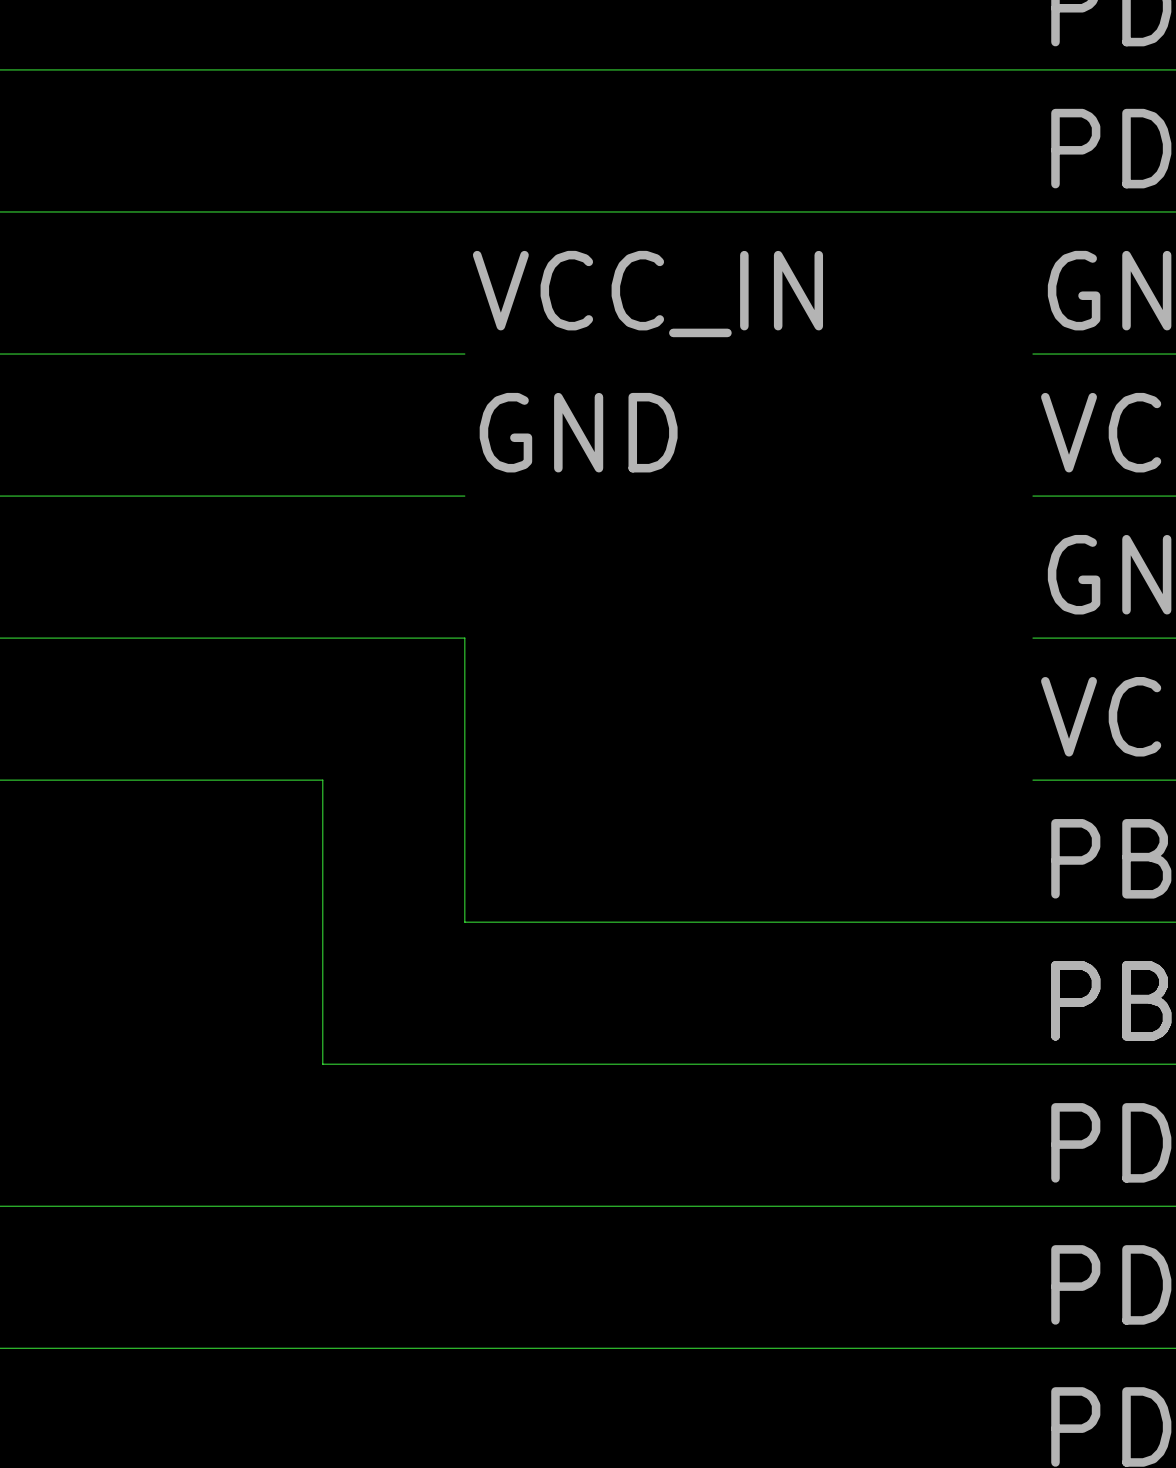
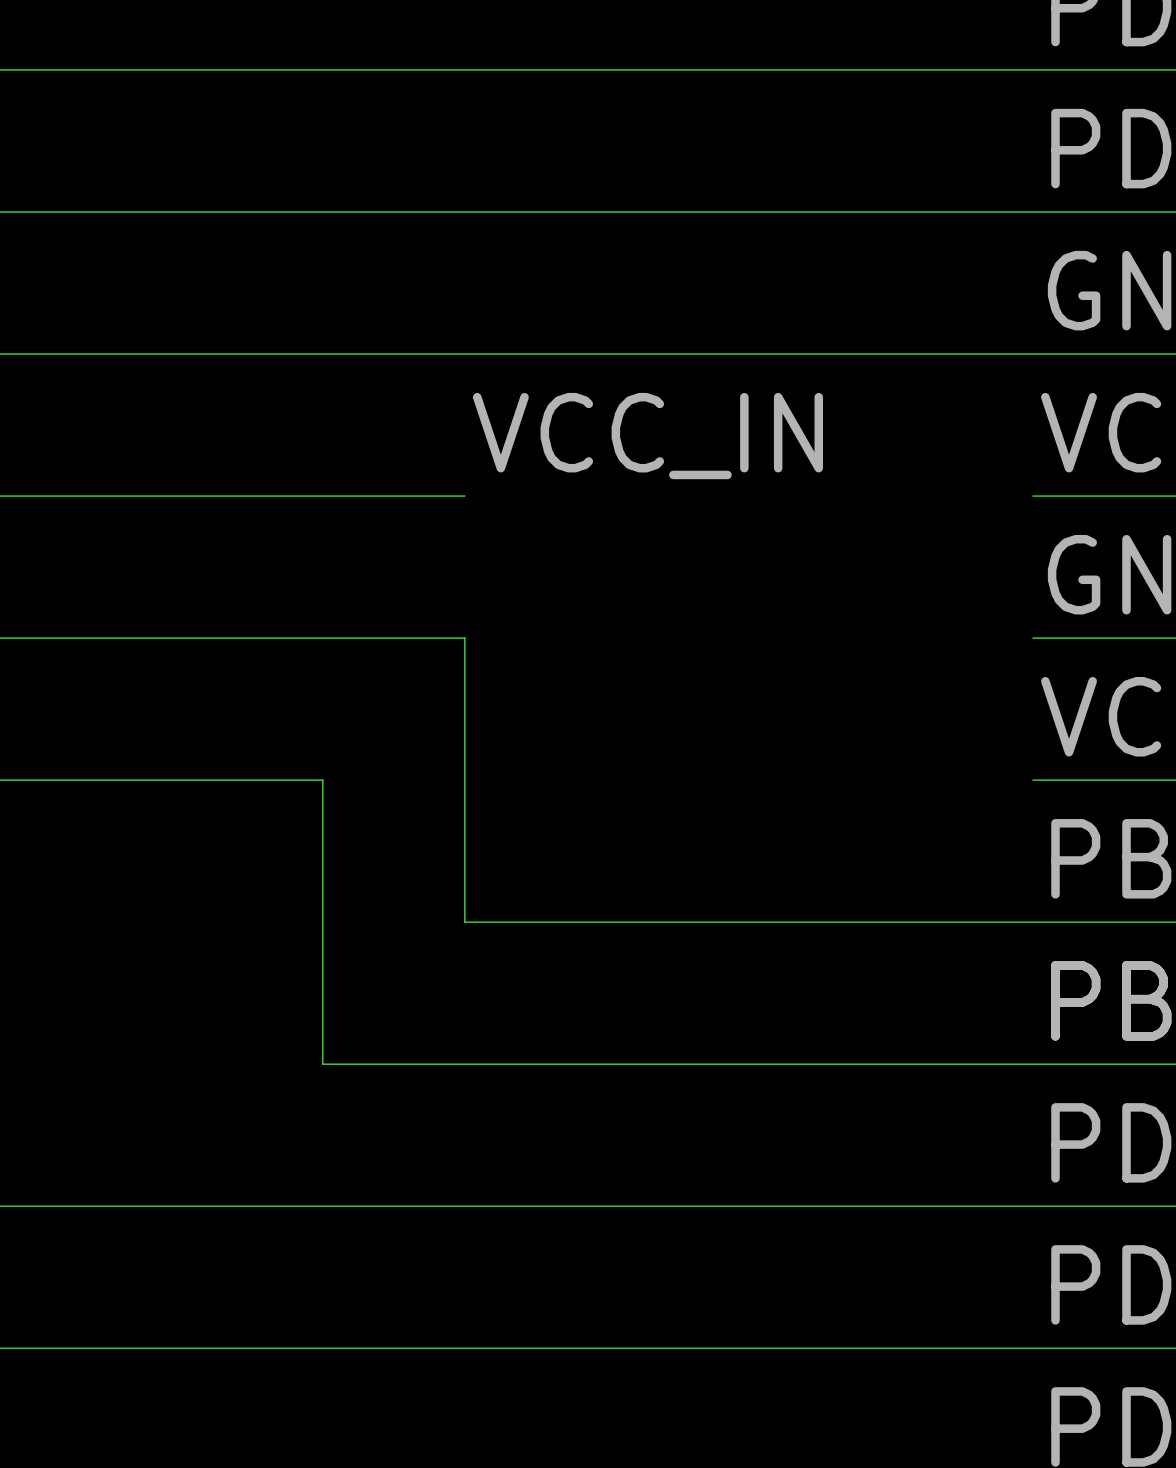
label: VCC_IN (647, 294) -> none
wire: none -> (464, 354) (1032, 354)
label: GND (578, 432) -> VCC_IN (647, 436)

